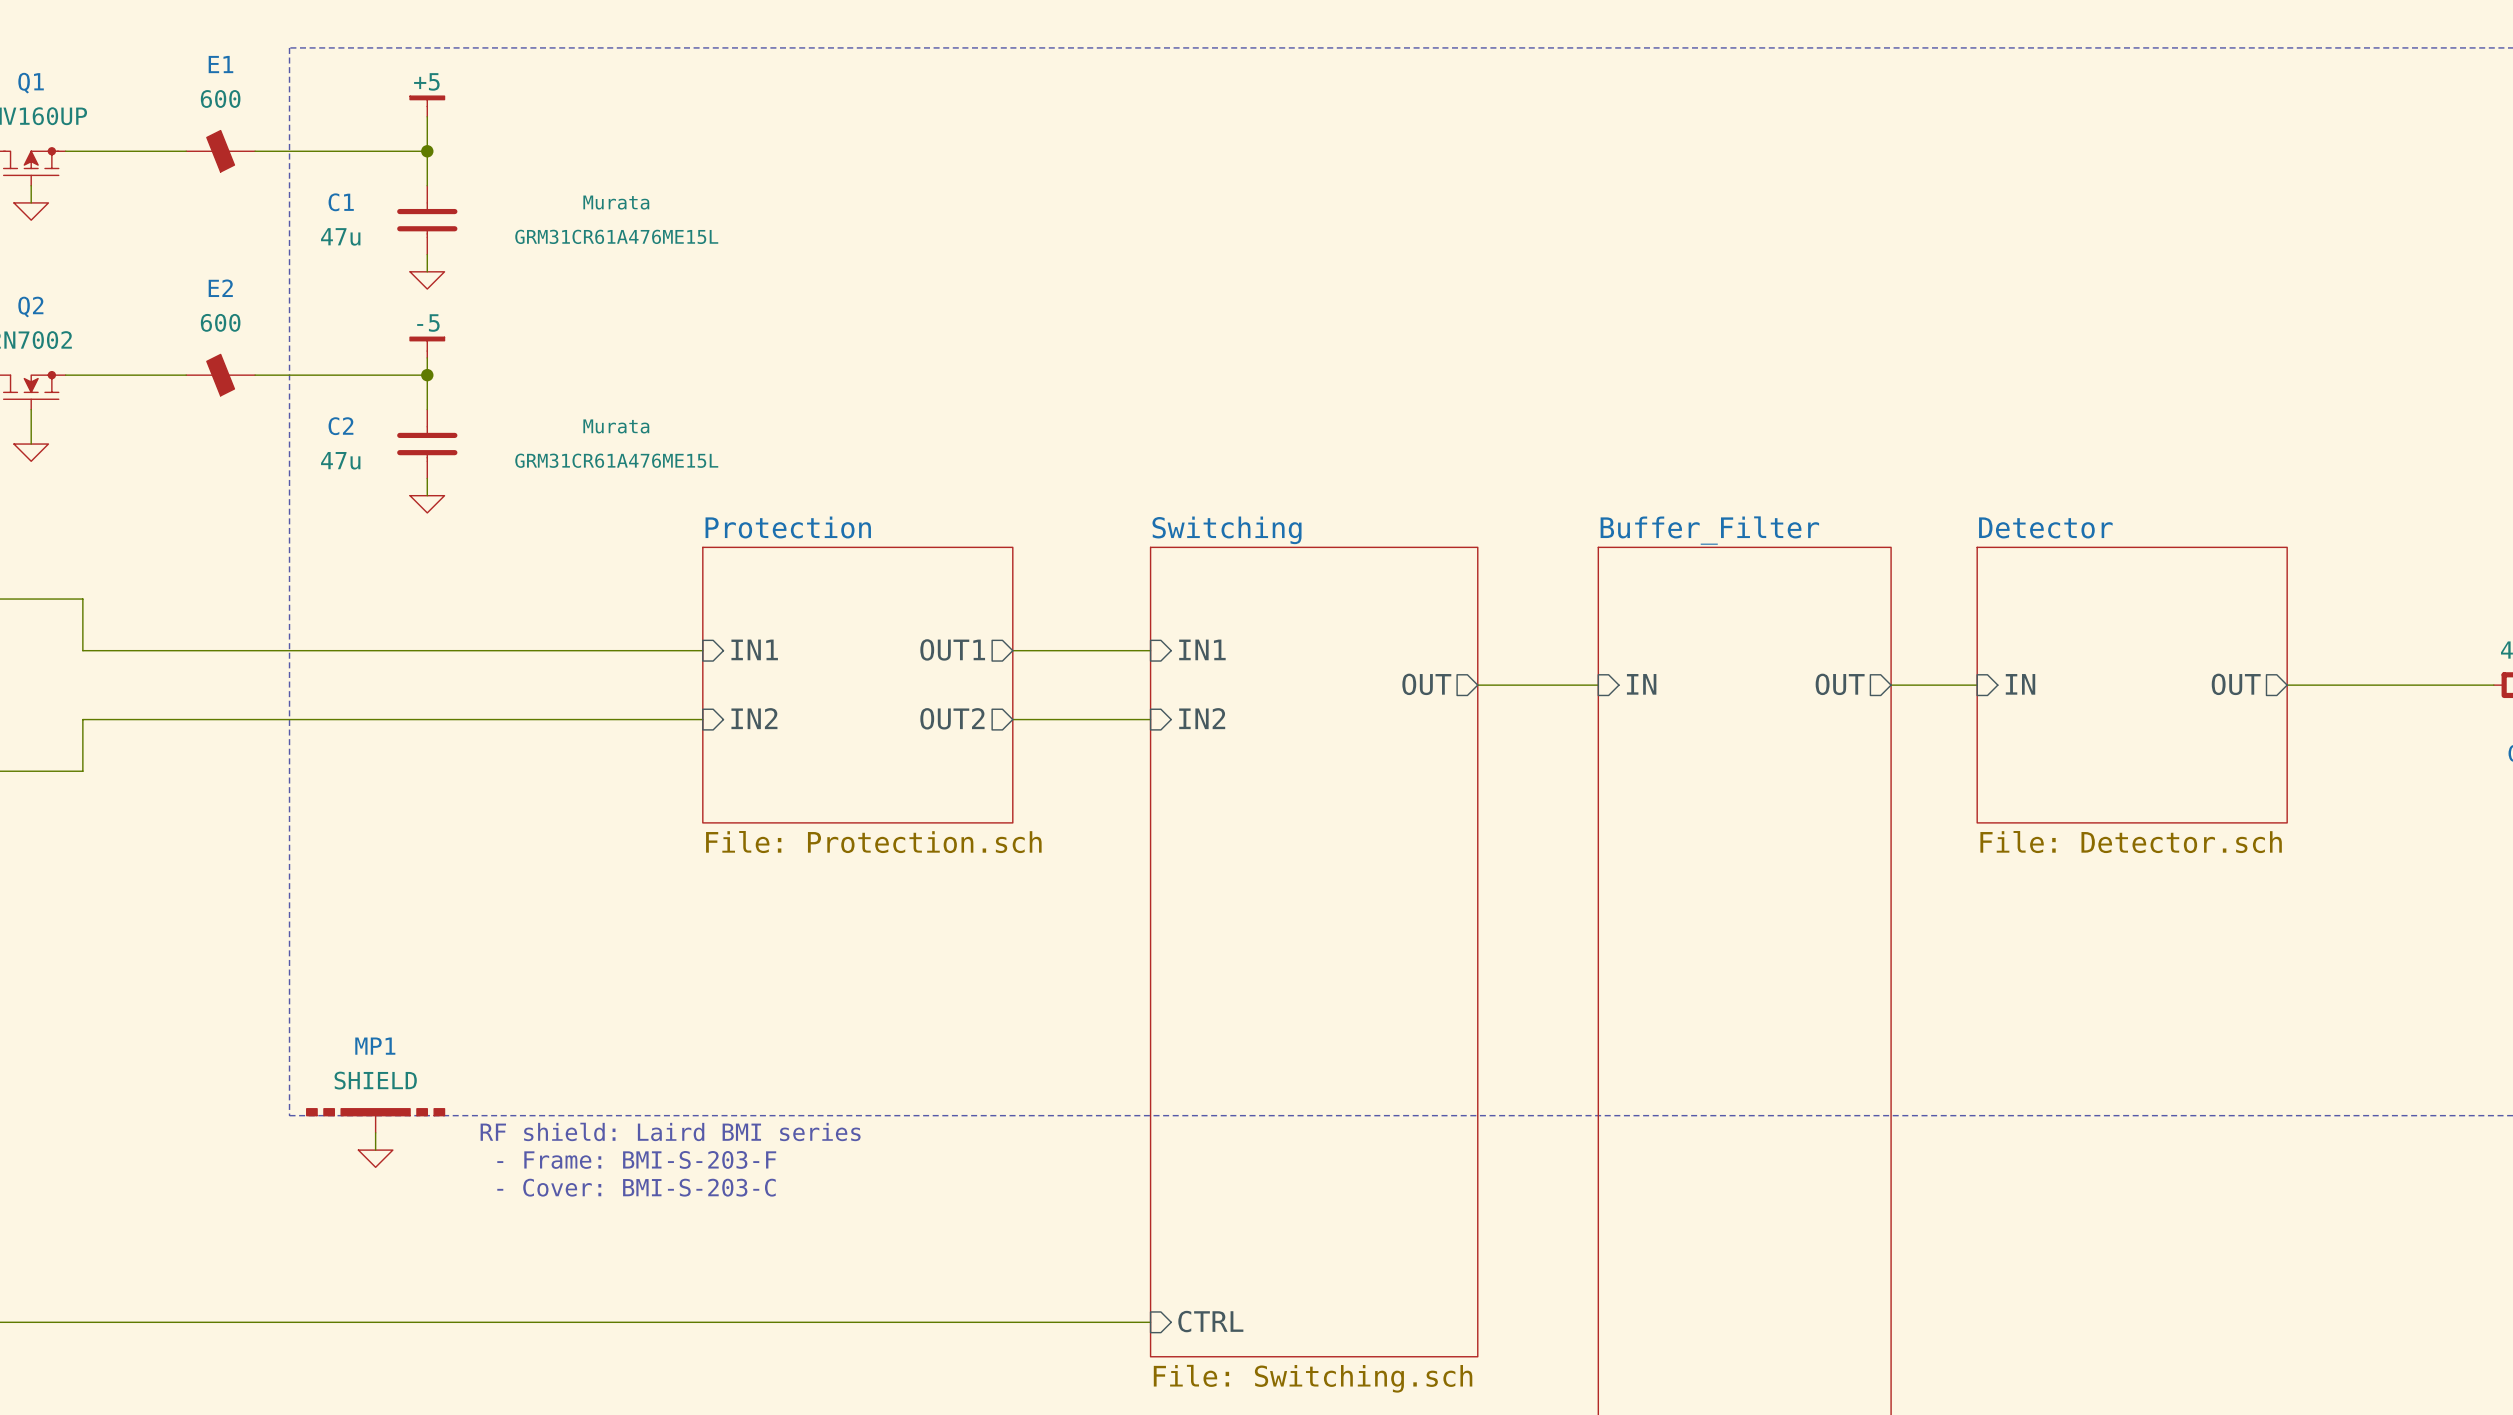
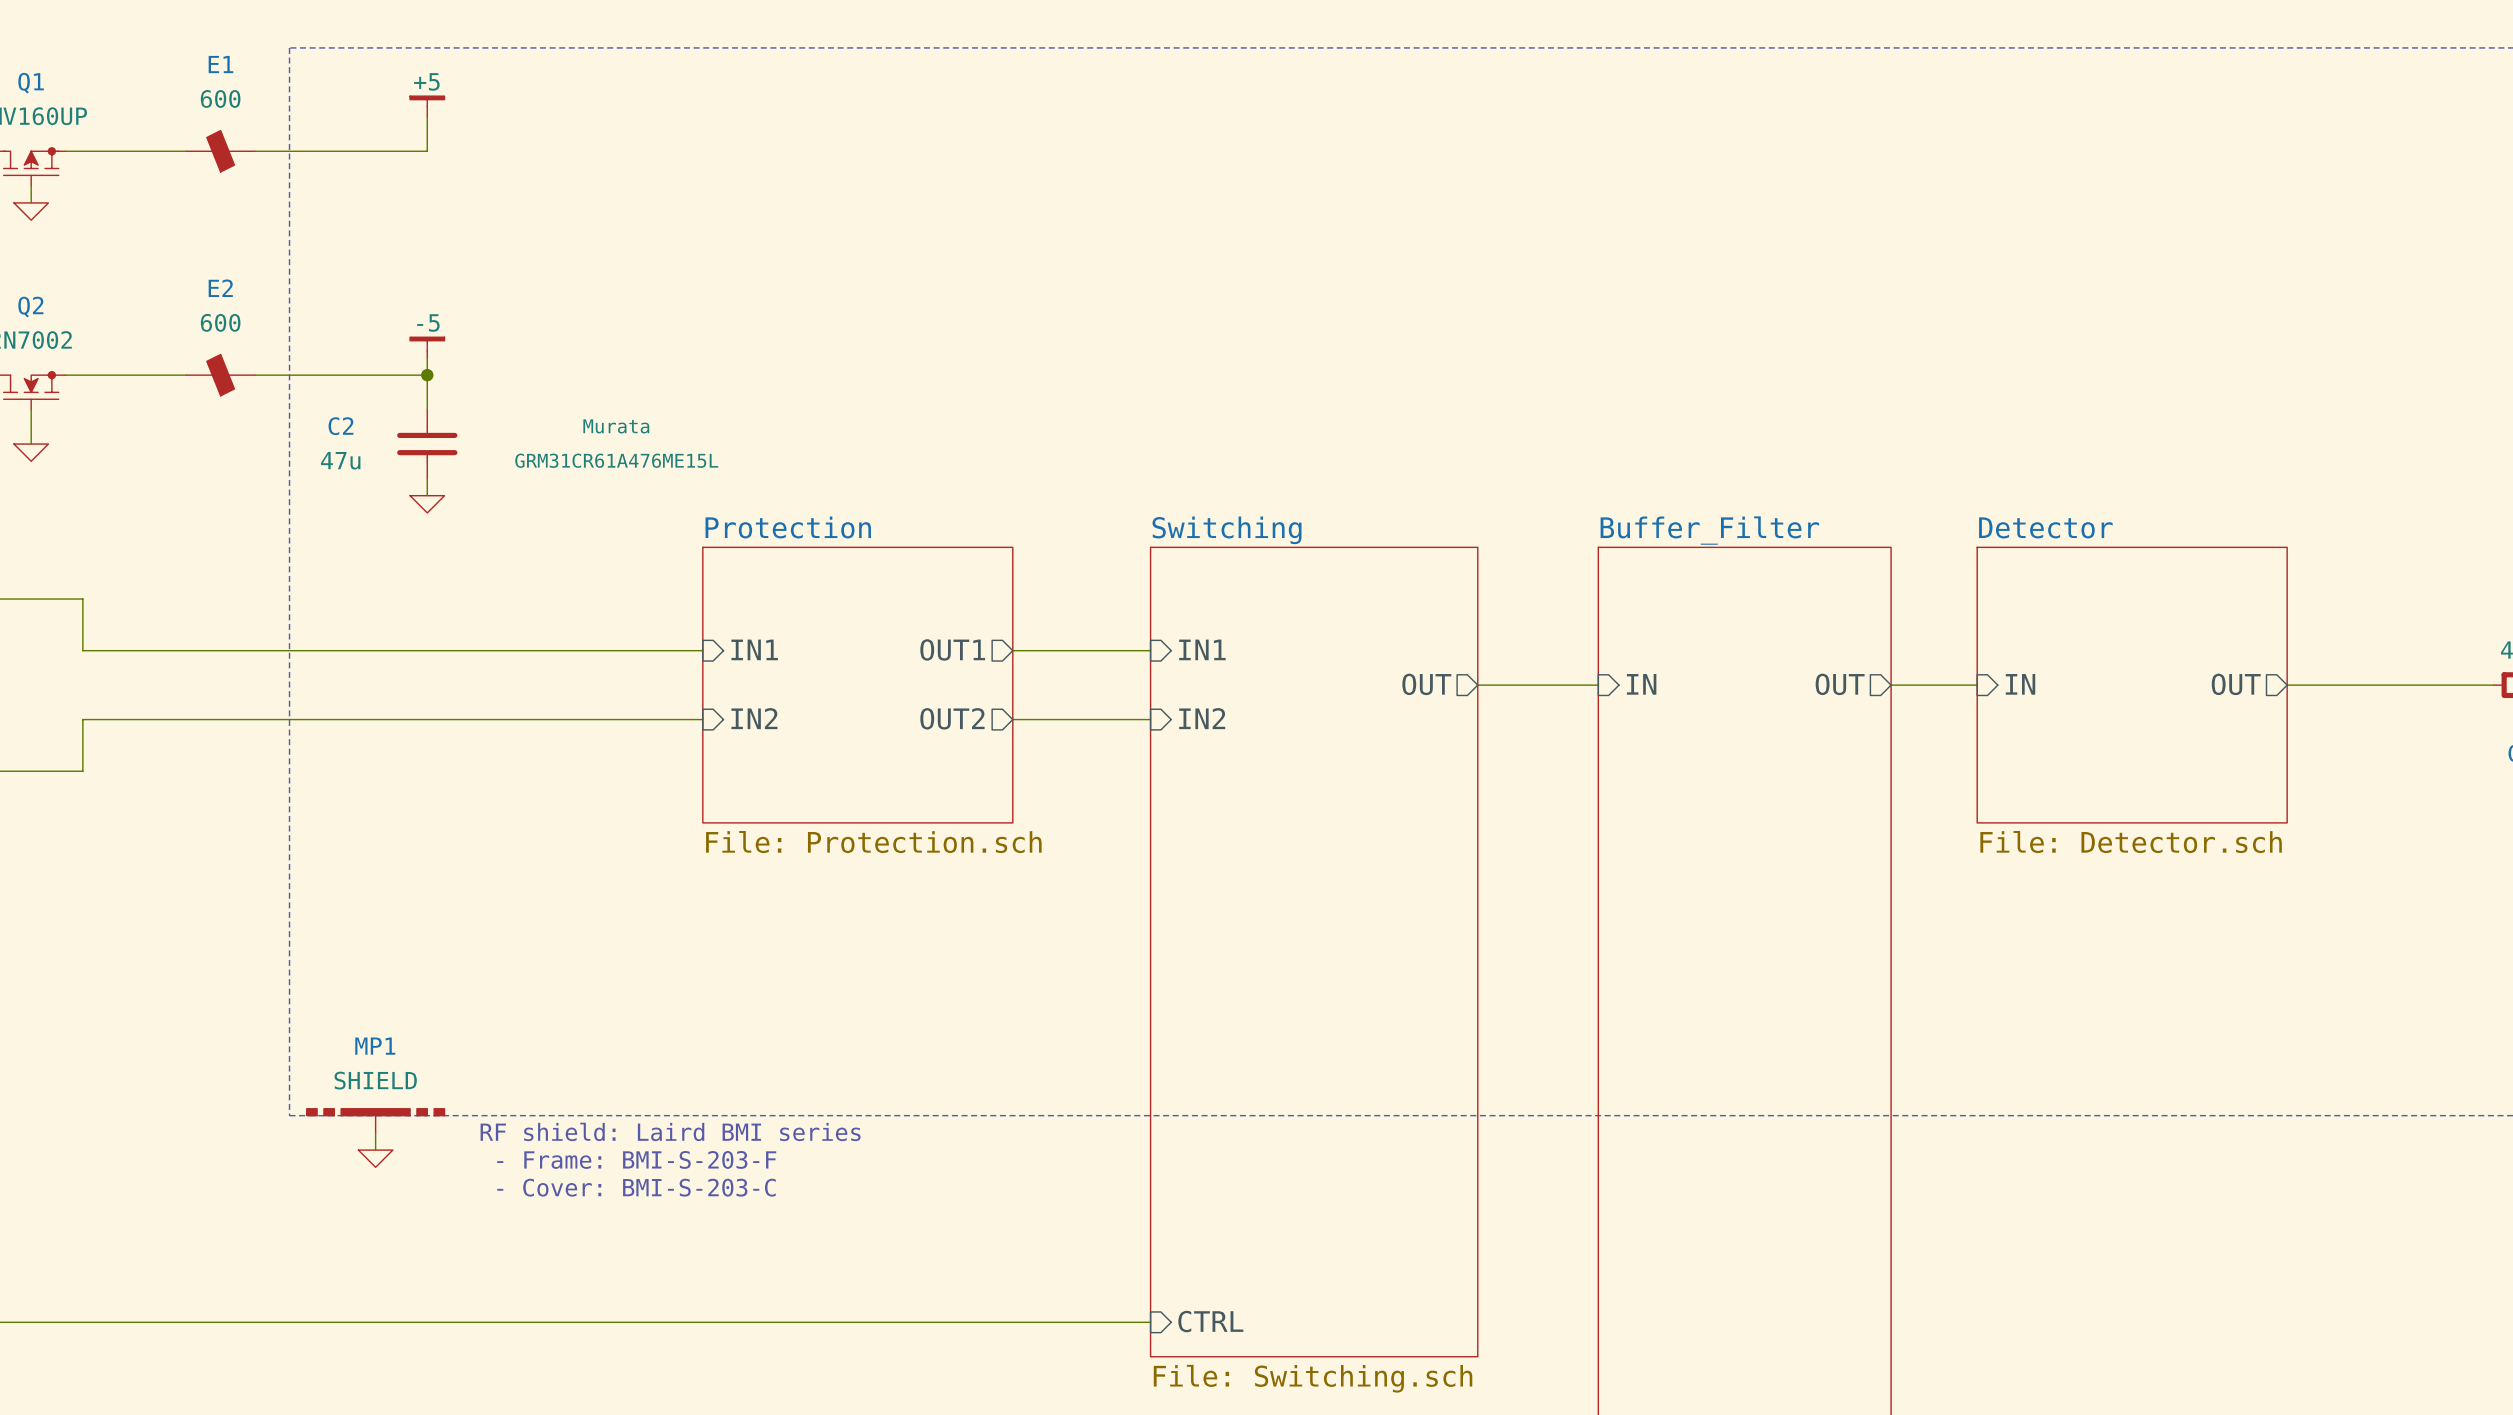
wire: (427, 151) (427, 185) -> none
junction: (427, 151) -> none
C1: 47u (427, 220) -> none
wire: (427, 254) (427, 271) -> none
power symbol: (427, 280) -> none

